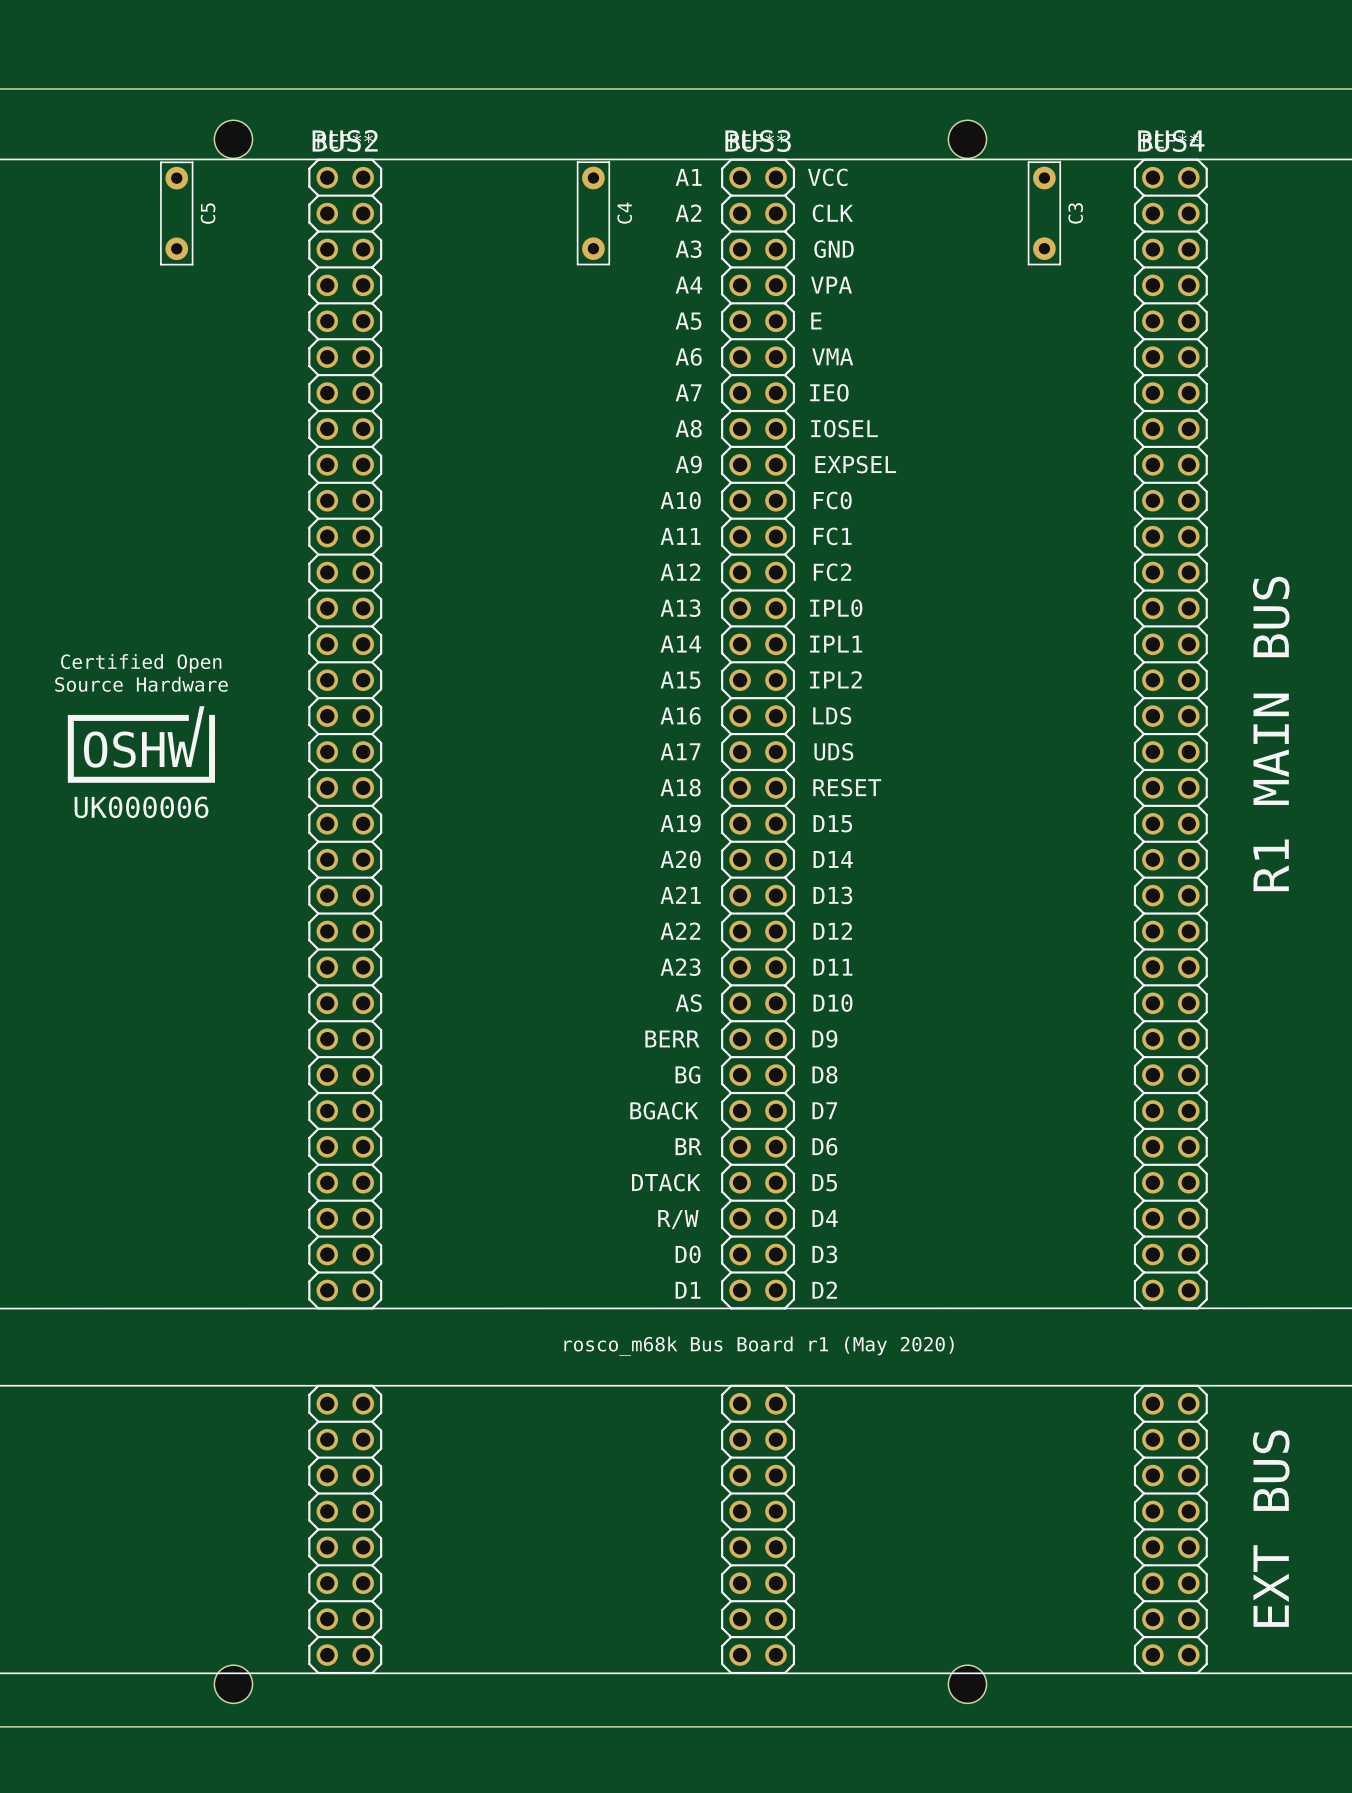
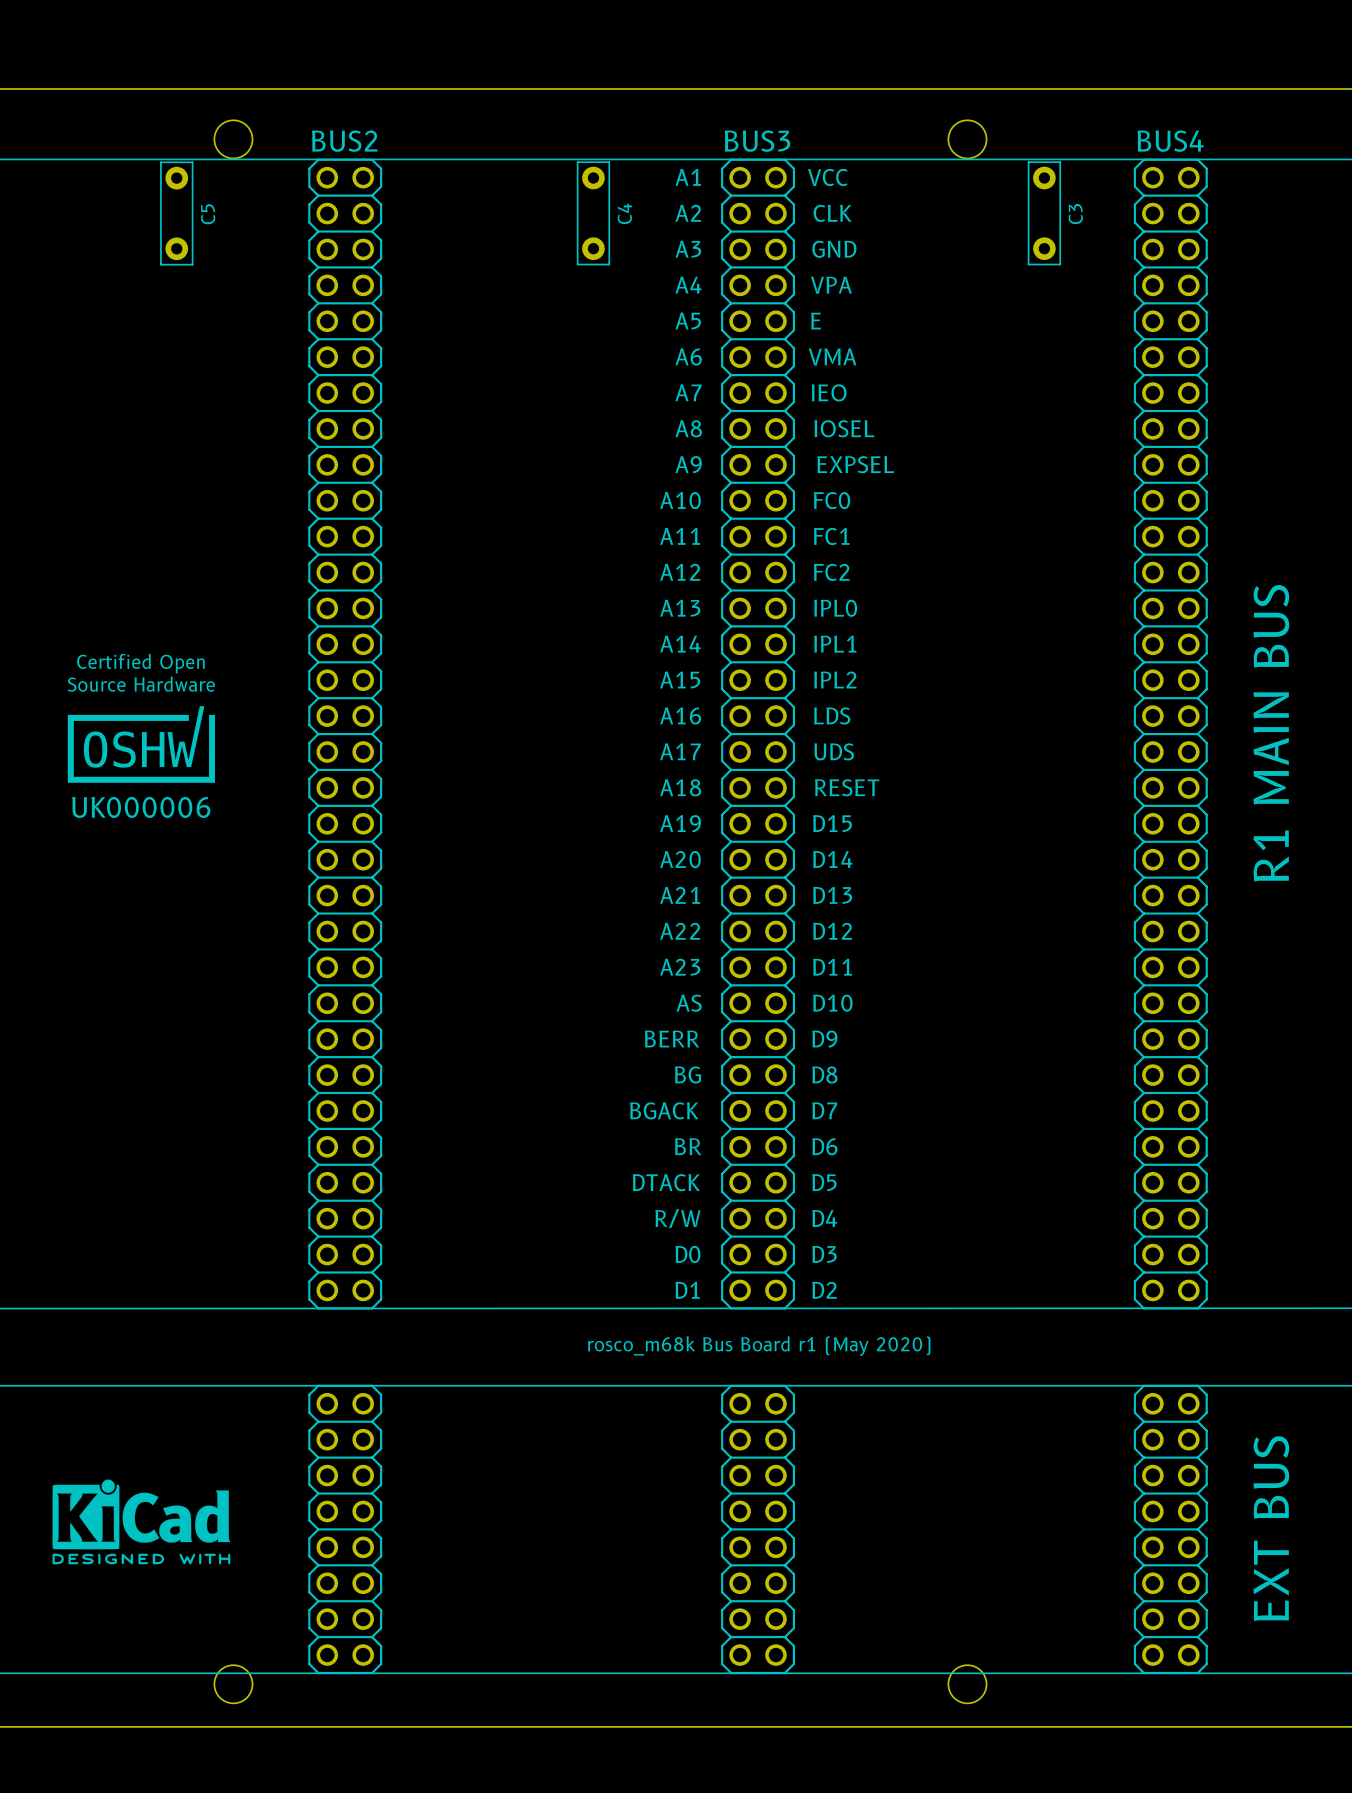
part footprint: [308, 158, 383, 1310] -> [308, 158, 383, 1310]
part footprint: [721, 158, 796, 1310] -> [721, 158, 796, 1310]
part footprint: [1133, 158, 1208, 1310] -> [1133, 158, 1208, 1310]
drawing: none -> [52, 1479, 231, 1565]

